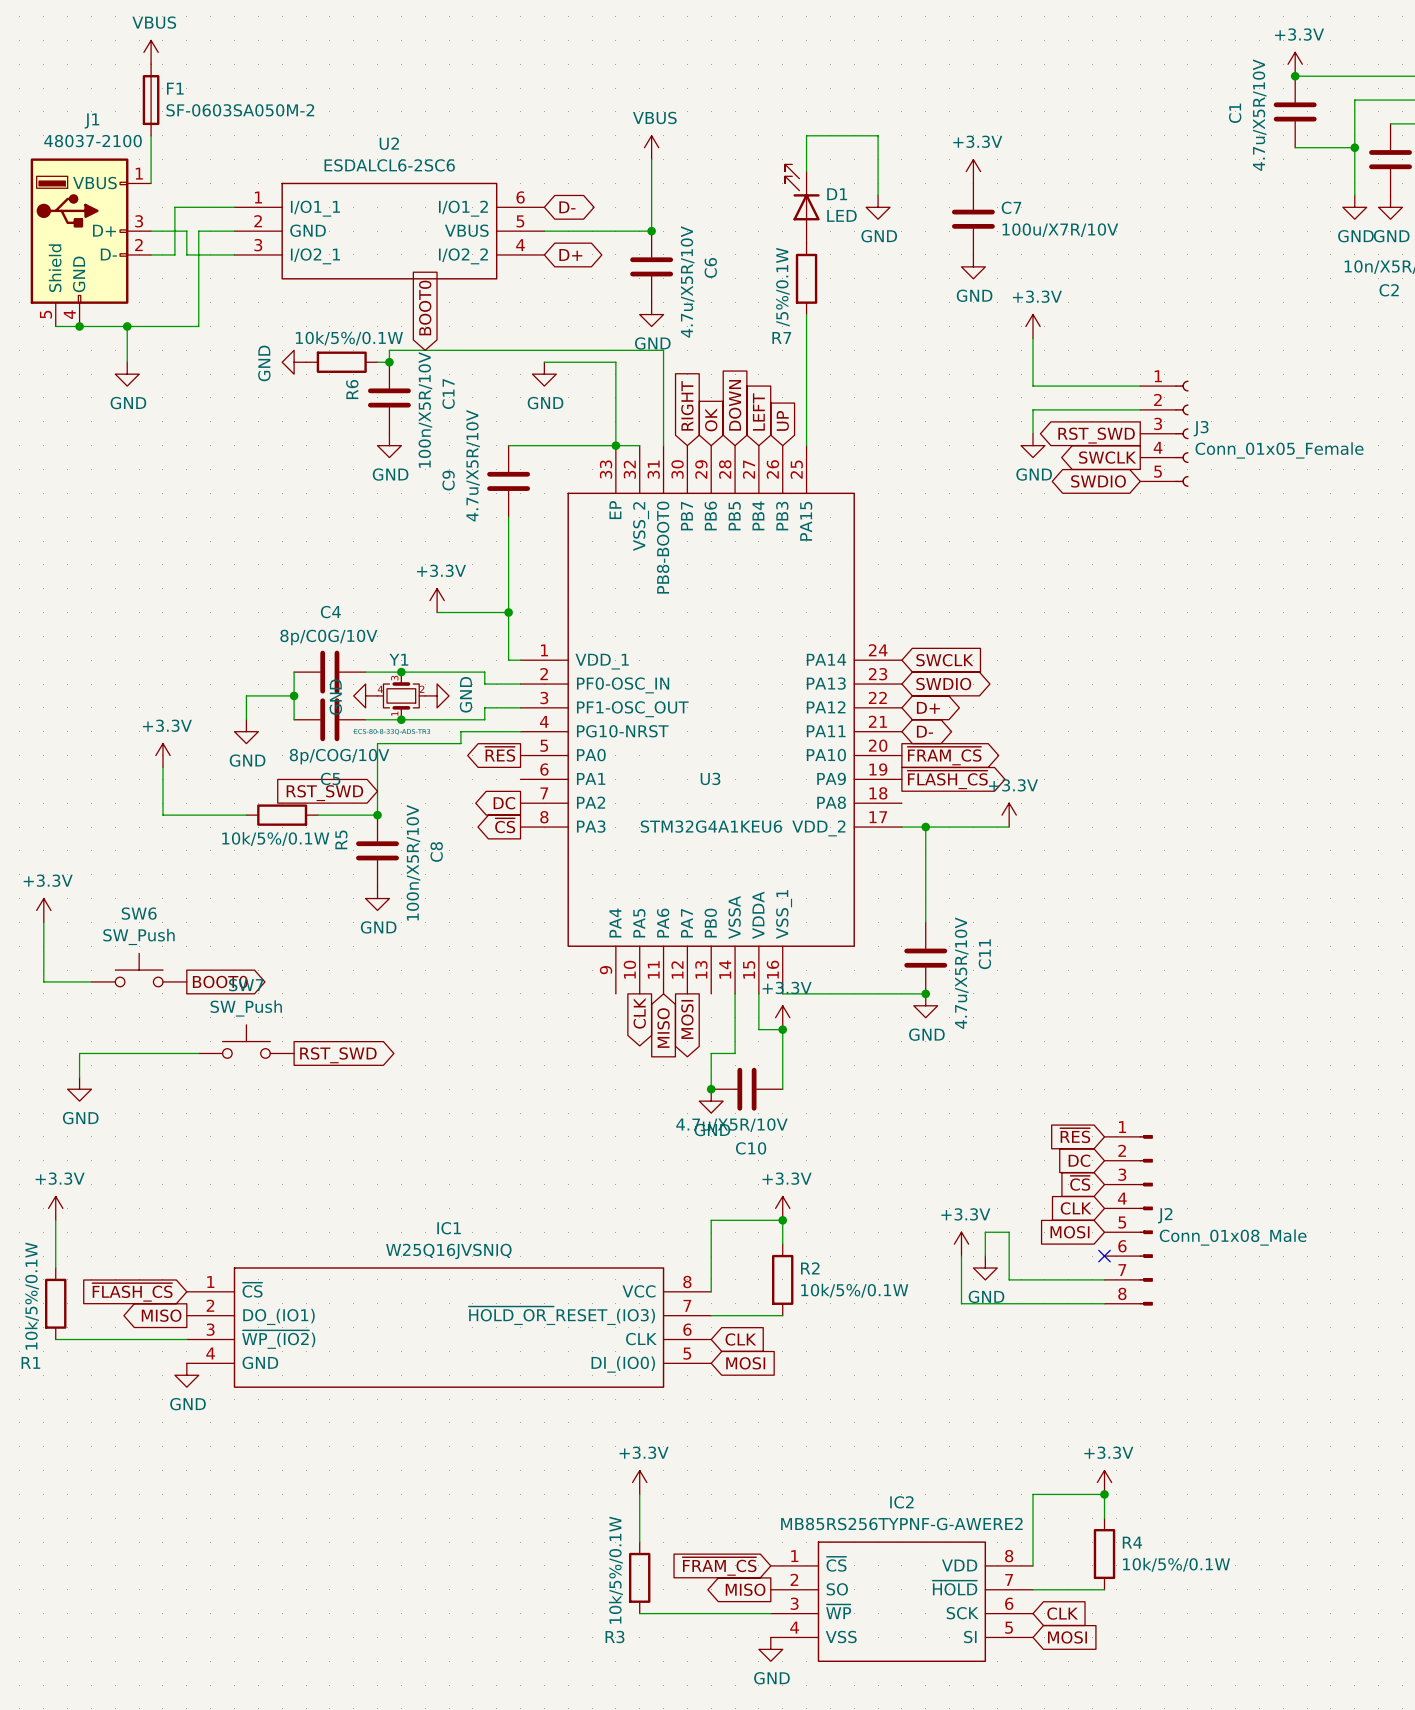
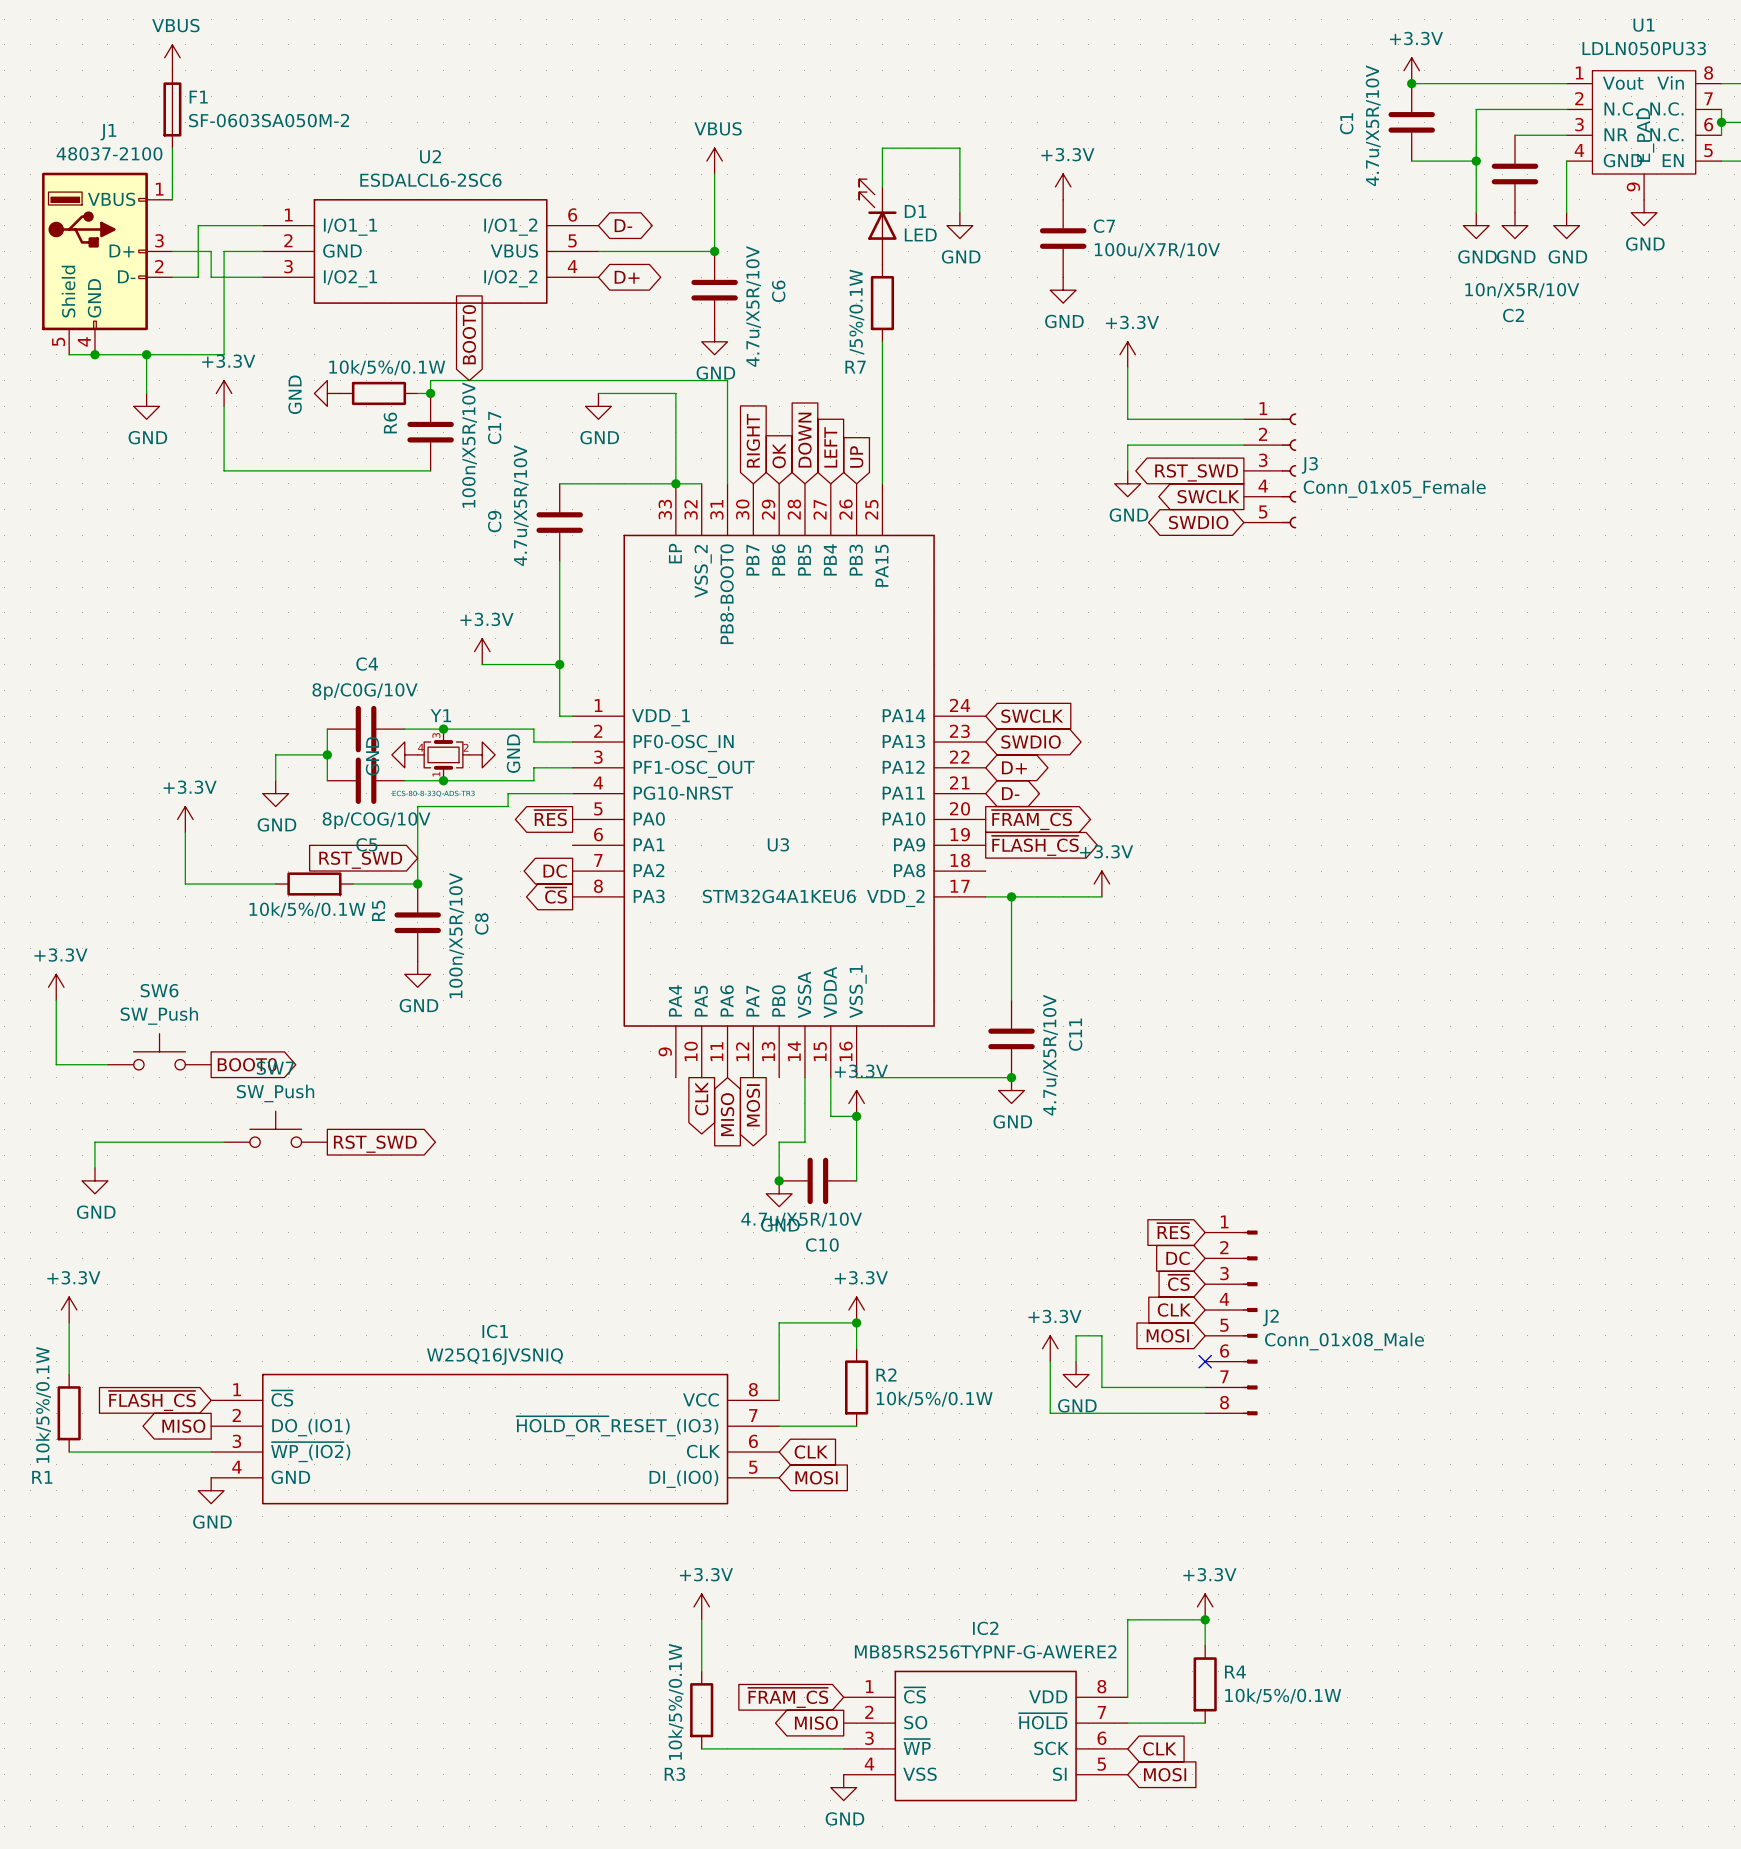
power symbol: none -> +3.3V (224, 393)
wire: none -> (224, 406) (224, 470) (430, 470)
power symbol: GND (389, 445) -> none

